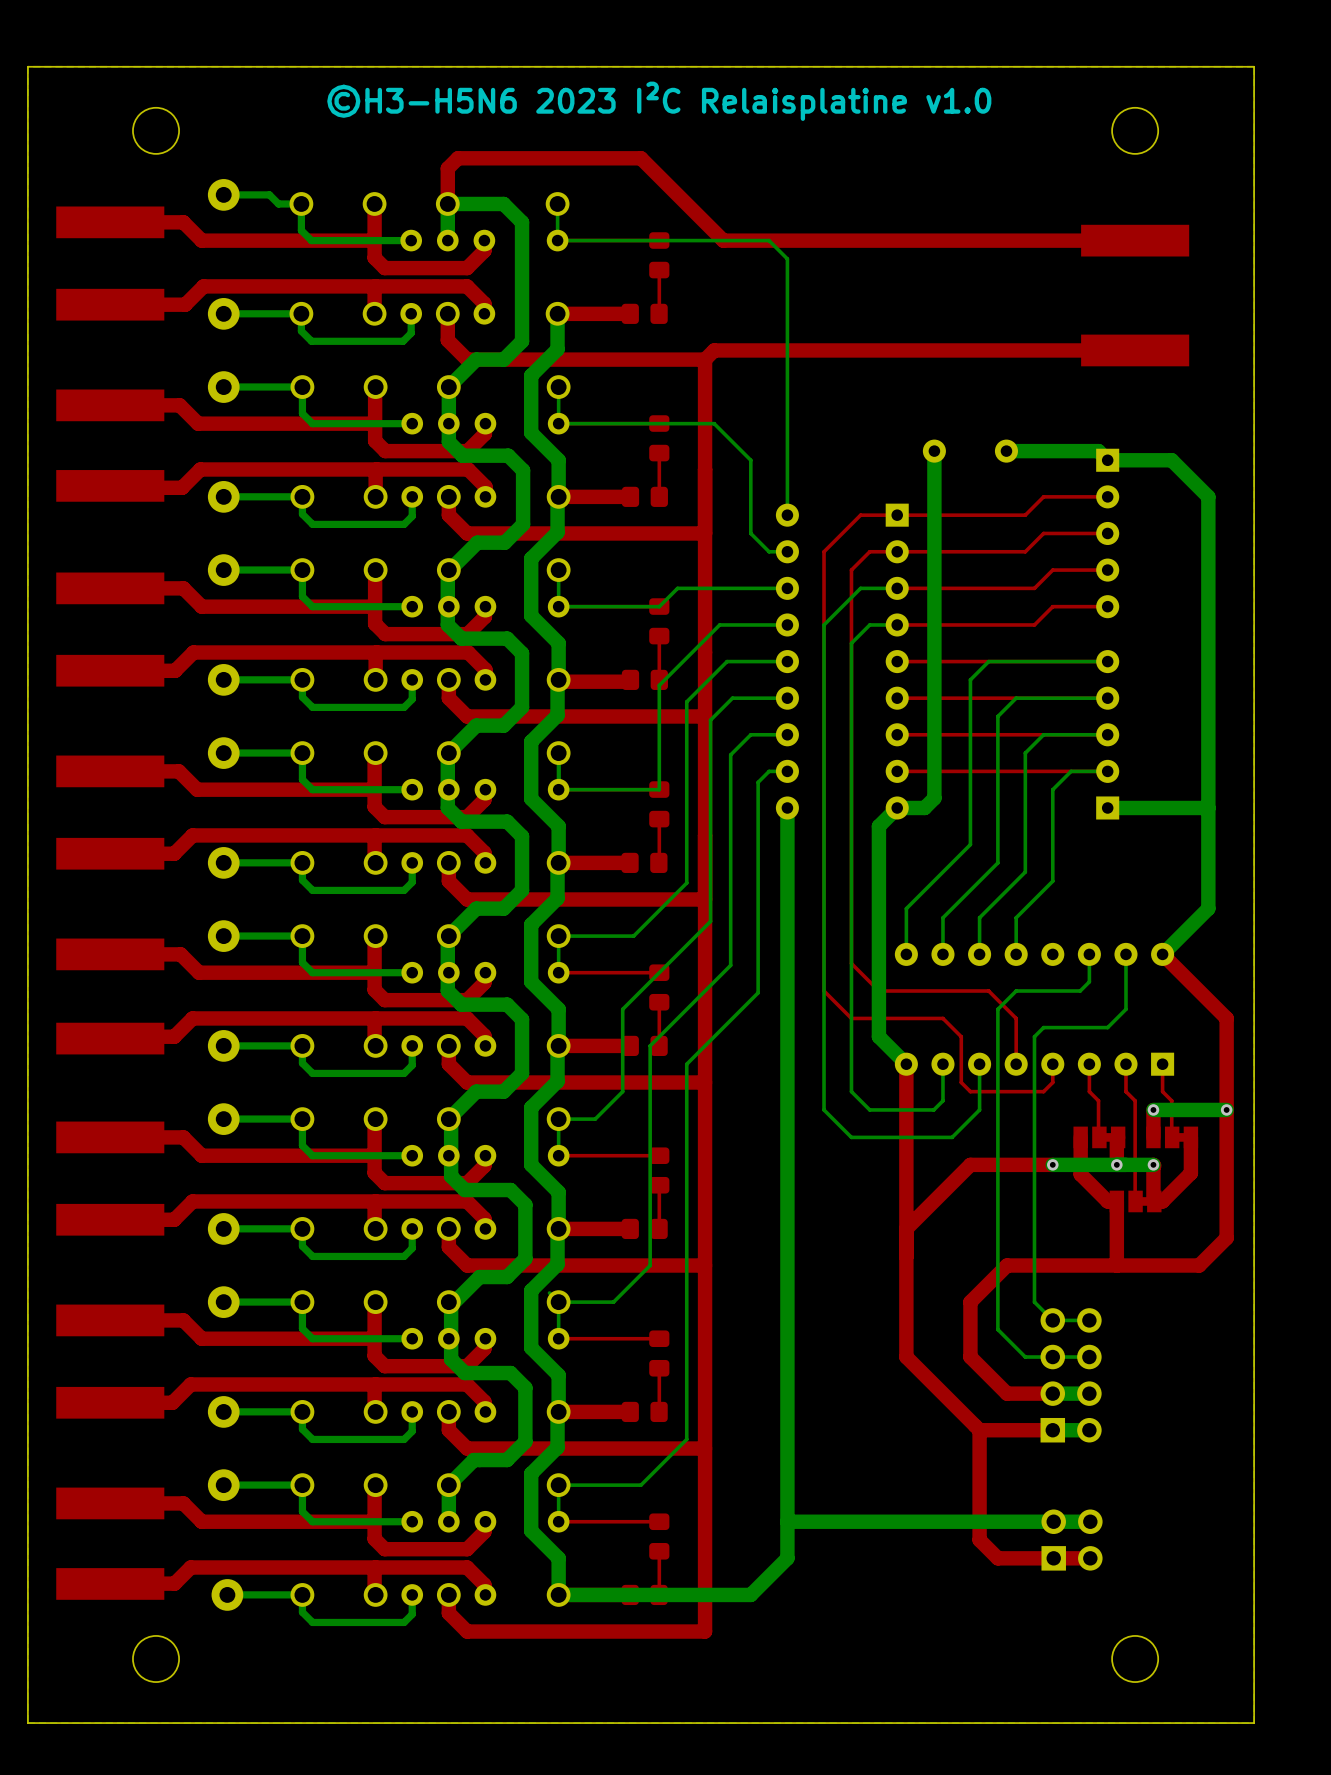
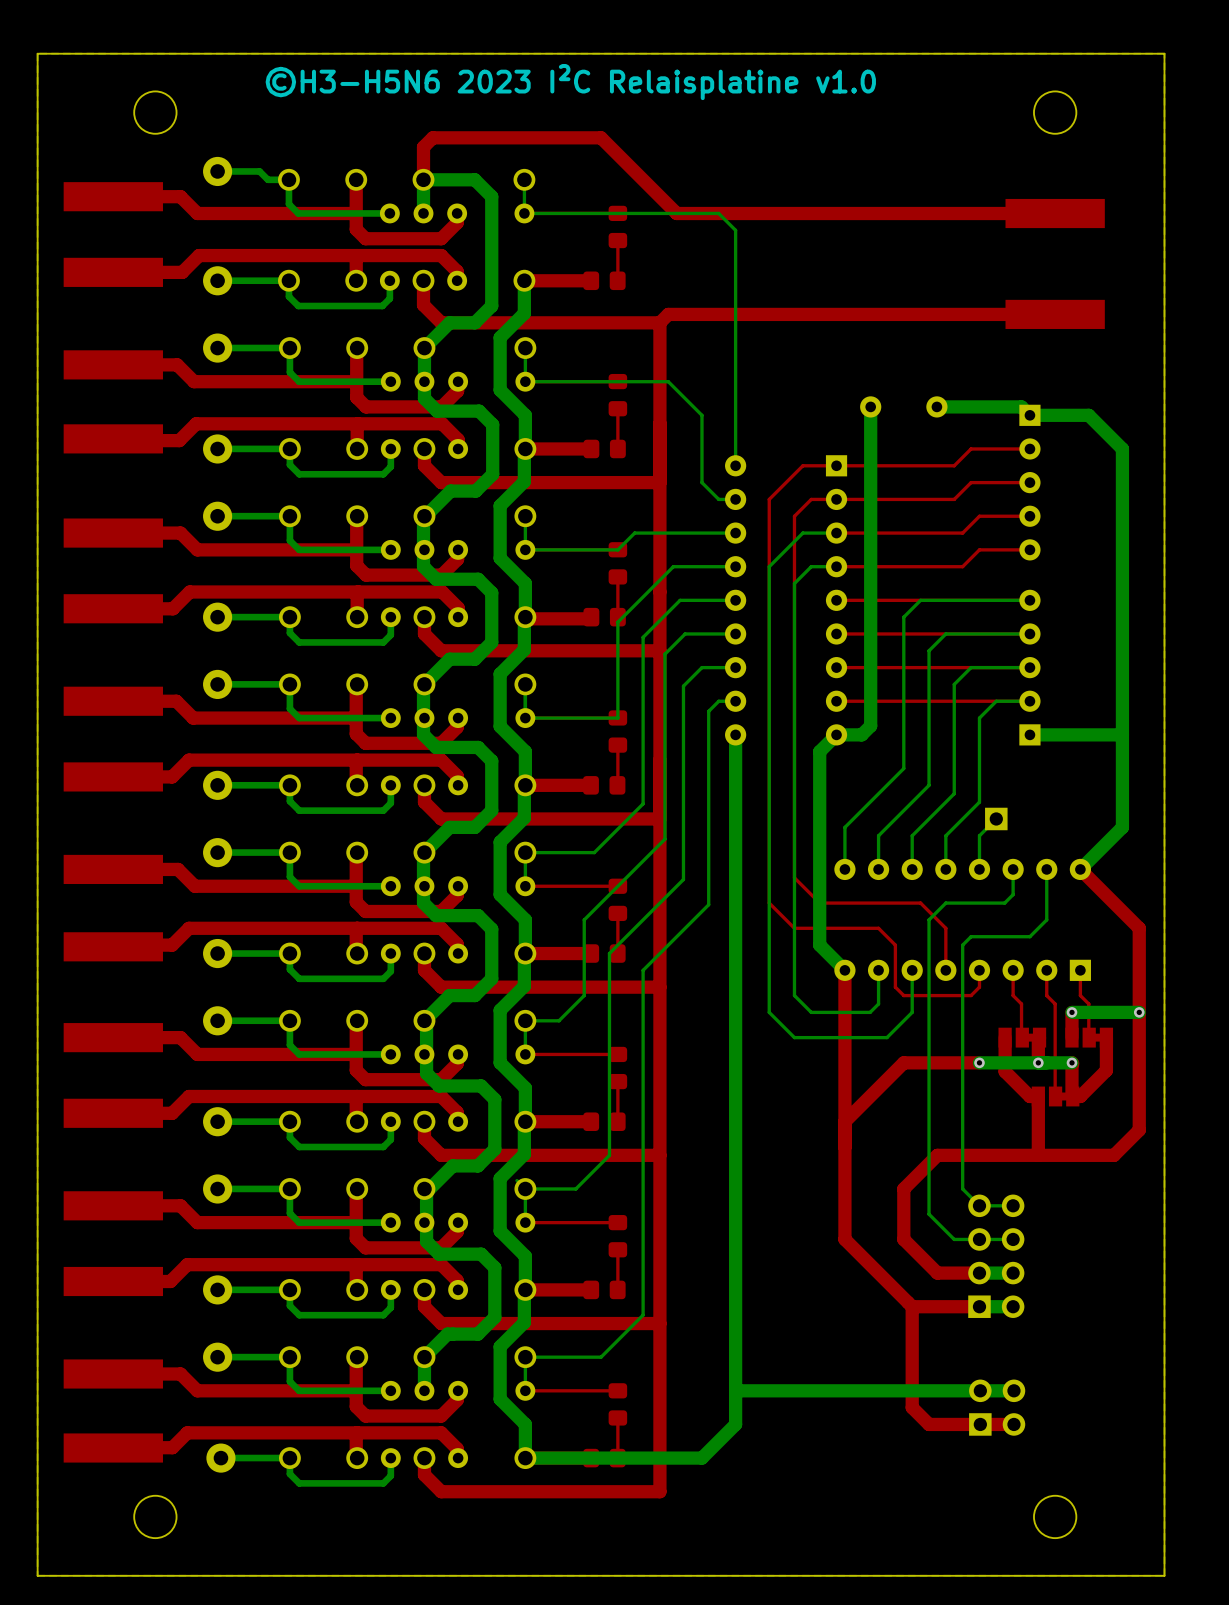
drawing: none -> [265, 63, 876, 101]
text: ©H3-H5N6 2023 I²C Relaisplatine v1.0 (659, 101) -> none
bottom track: none -> (996, 818) (979, 835) (979, 869)
part: none -> (996, 818)

